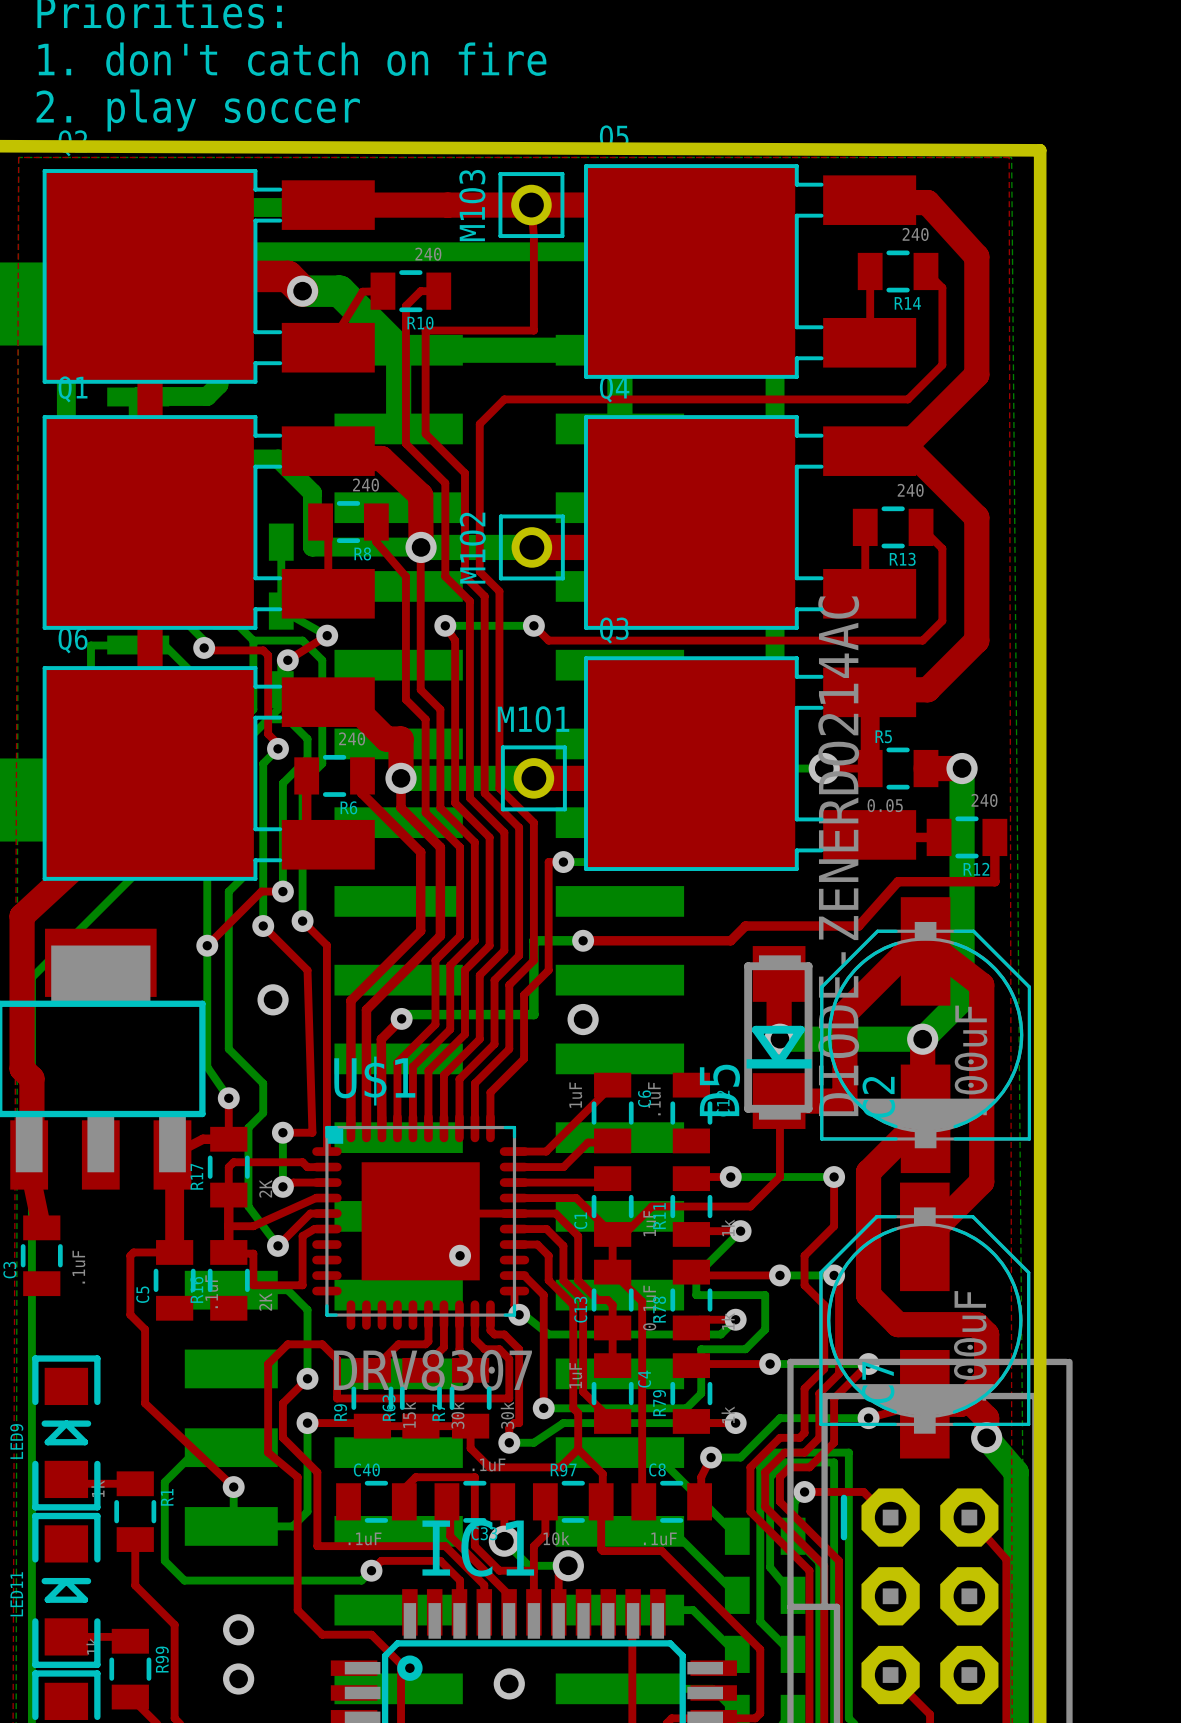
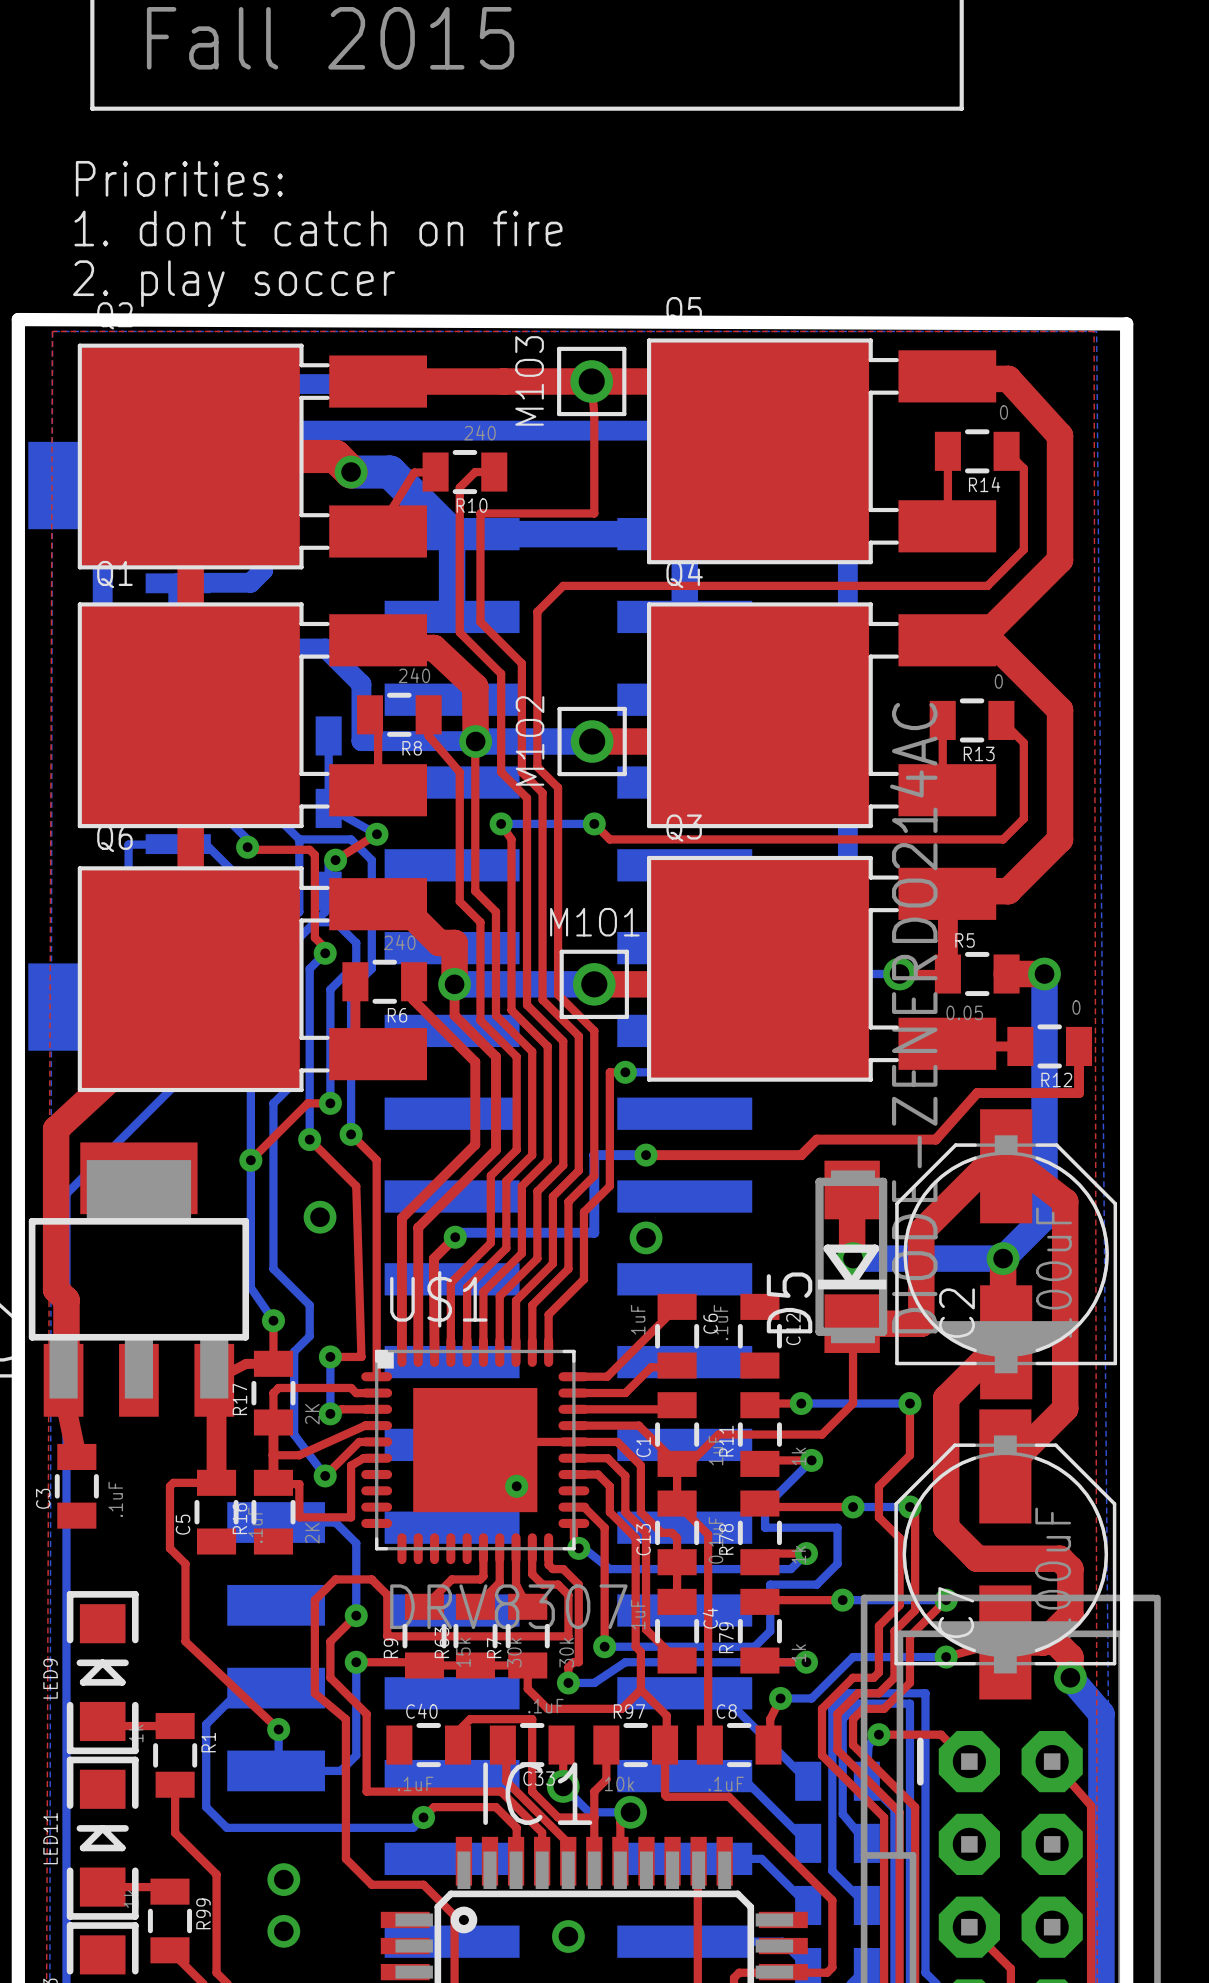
R14 value: 240 (915, 234) -> 0 (1003, 412)
R13 value: 240 (910, 490) -> 0 (998, 681)
R12 value: 240 (984, 800) -> 0 (1076, 1007)

